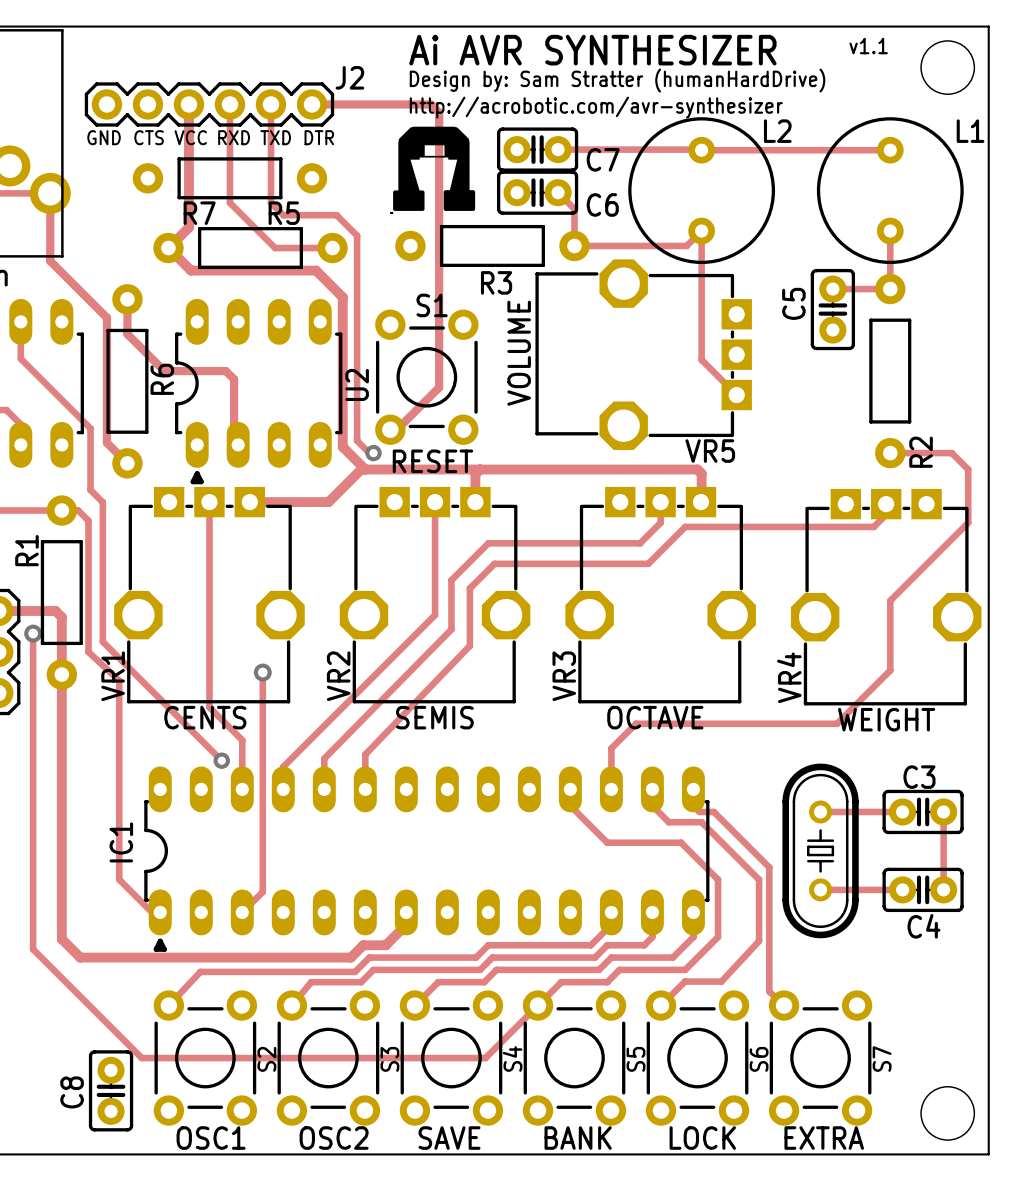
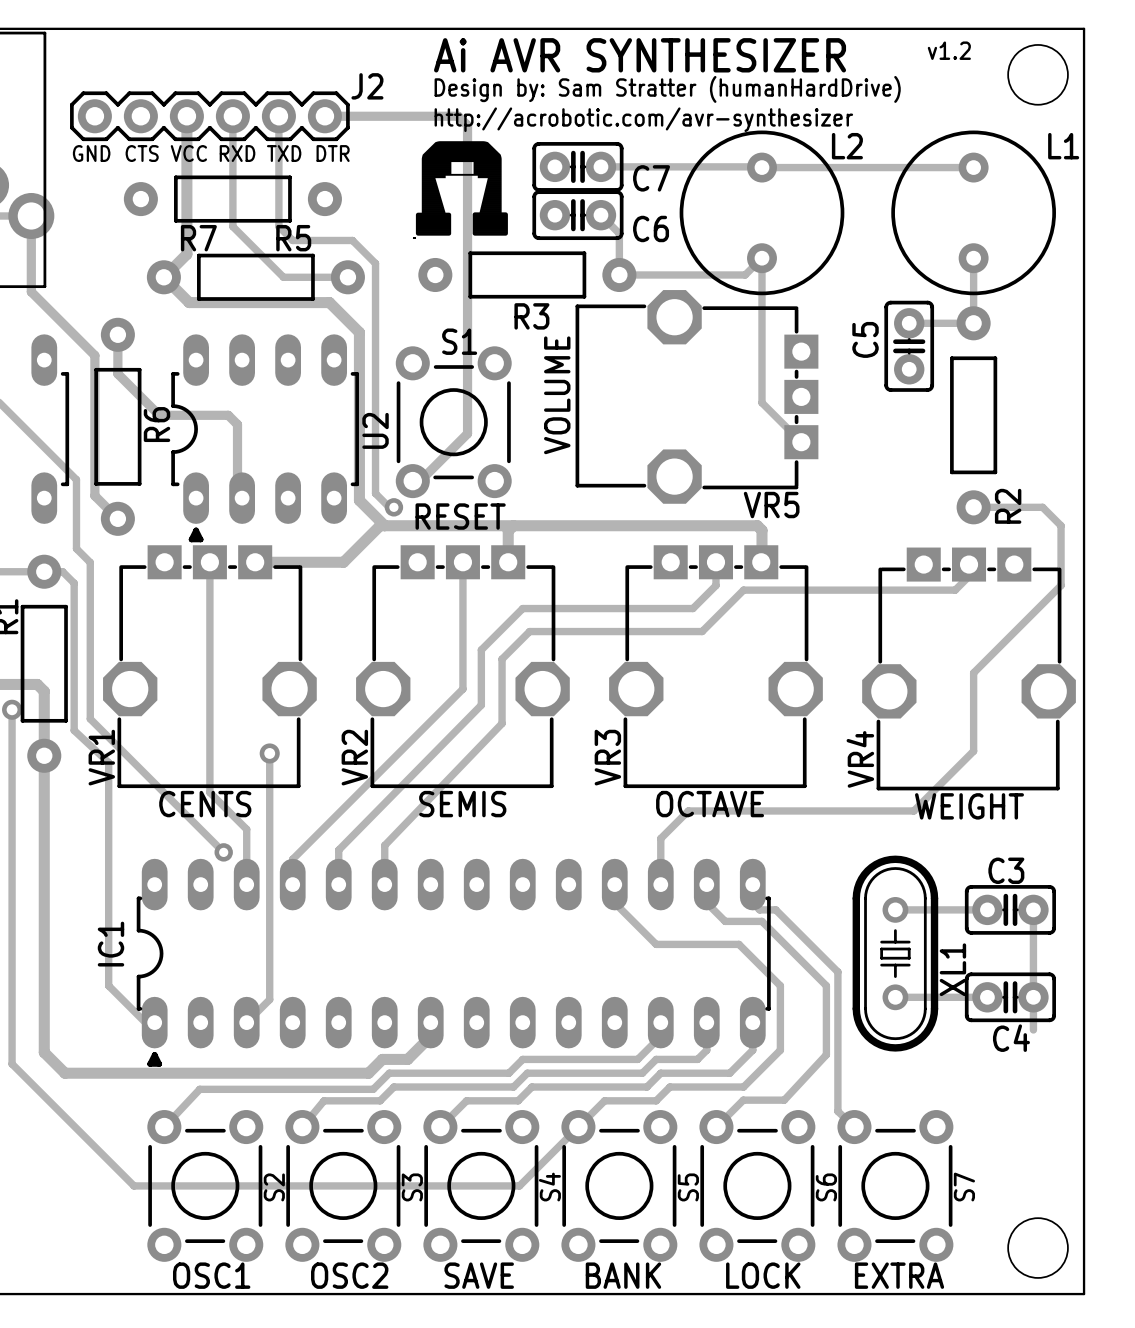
text: v1.1 (868, 46) -> v1.2 (949, 50)
XL1 name: none -> XL1 (952, 969)
track: none -> (1033, 997) (1033, 1029)
C8: (111, 1090) -> none

